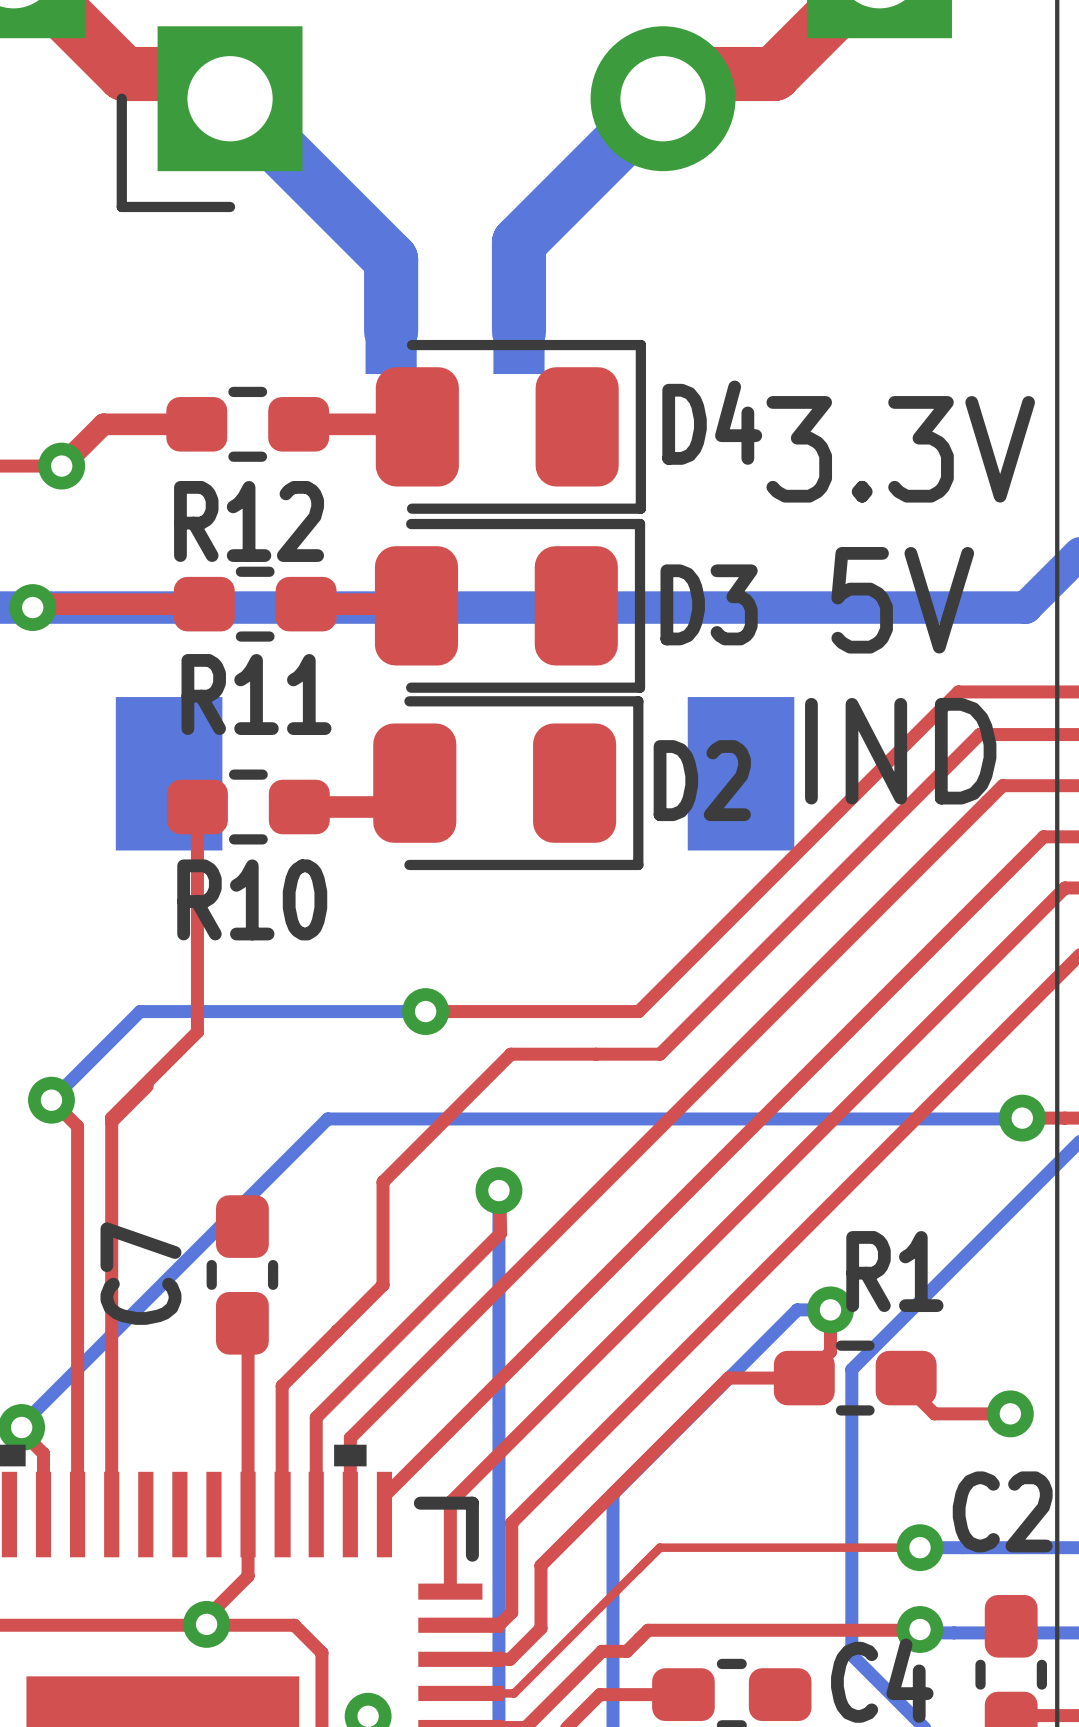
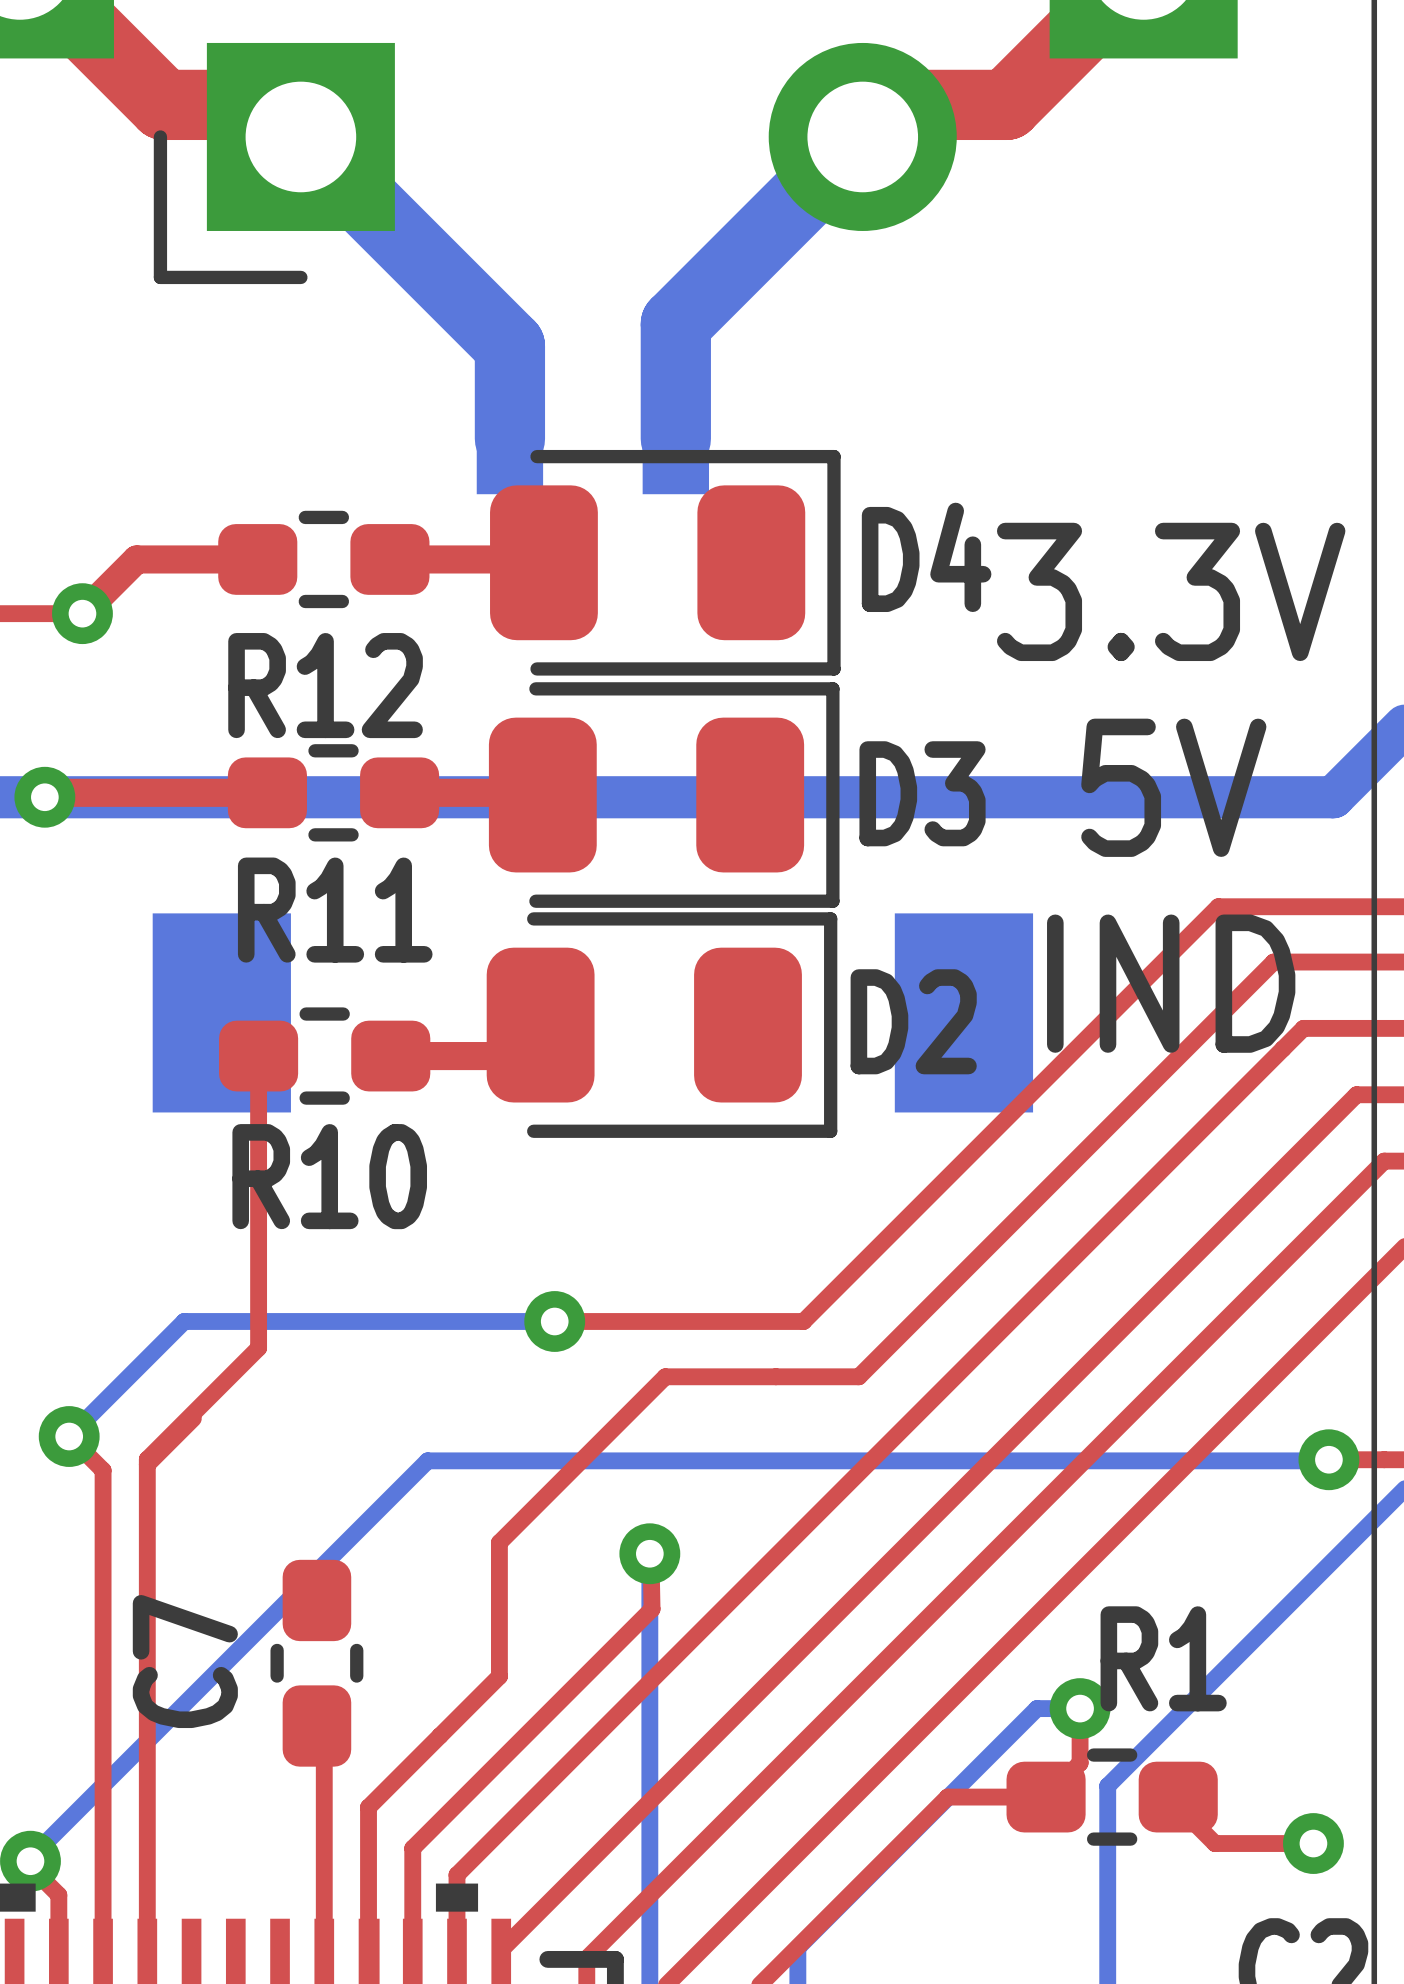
top track: (958, 691) (638, 1011) (617, 1011) -> (1245, 906) (1218, 906) (803, 1321)

